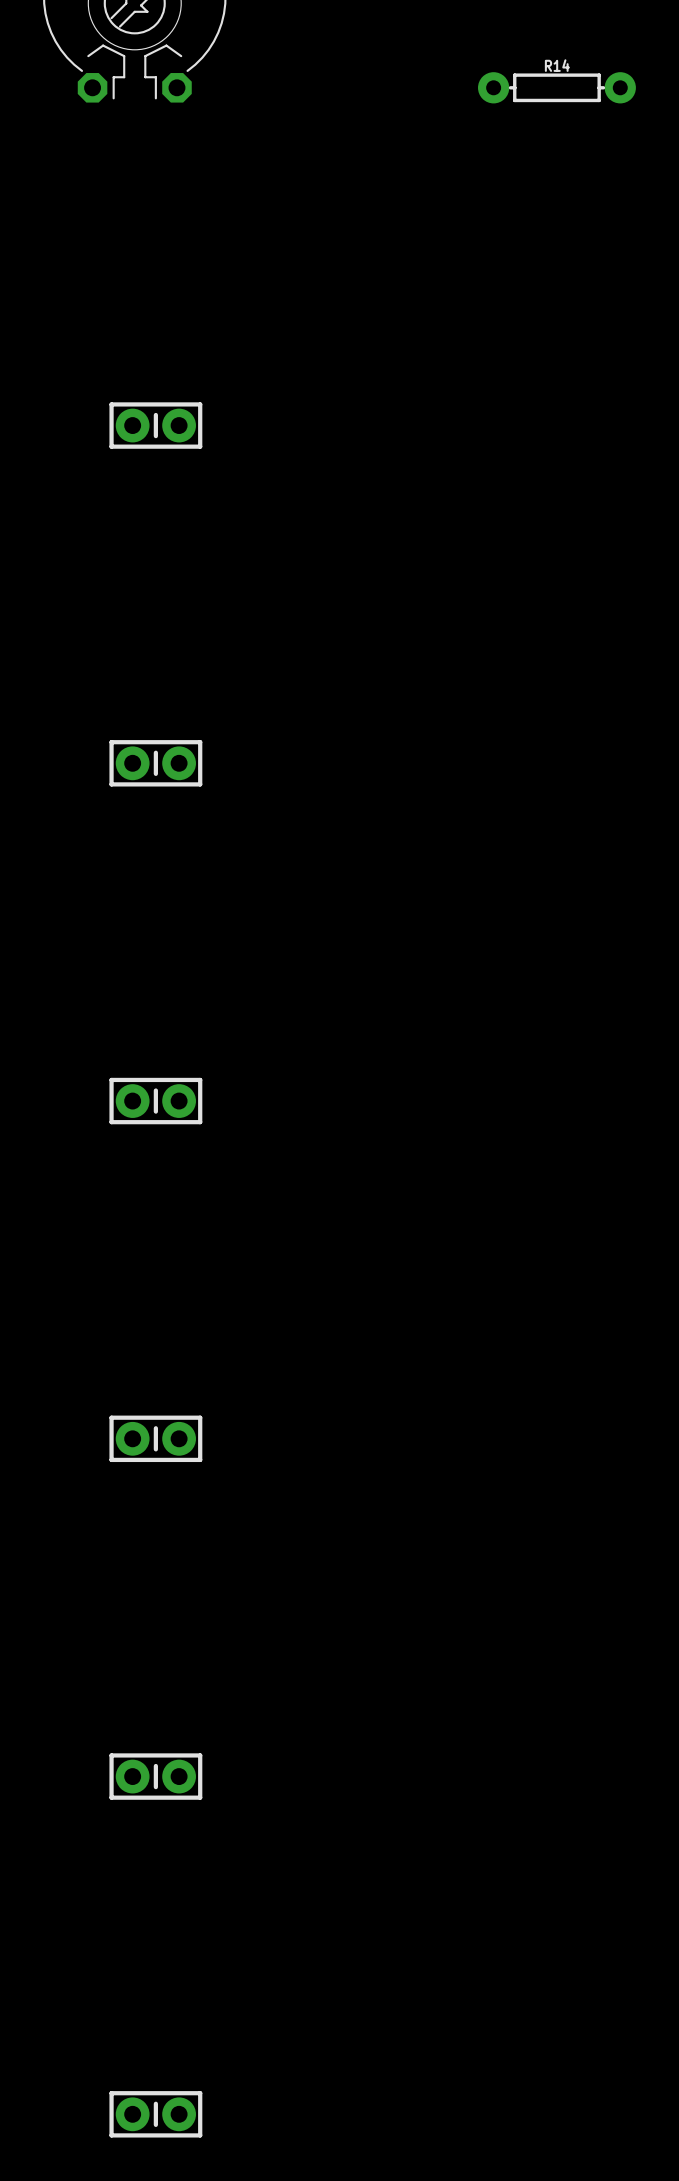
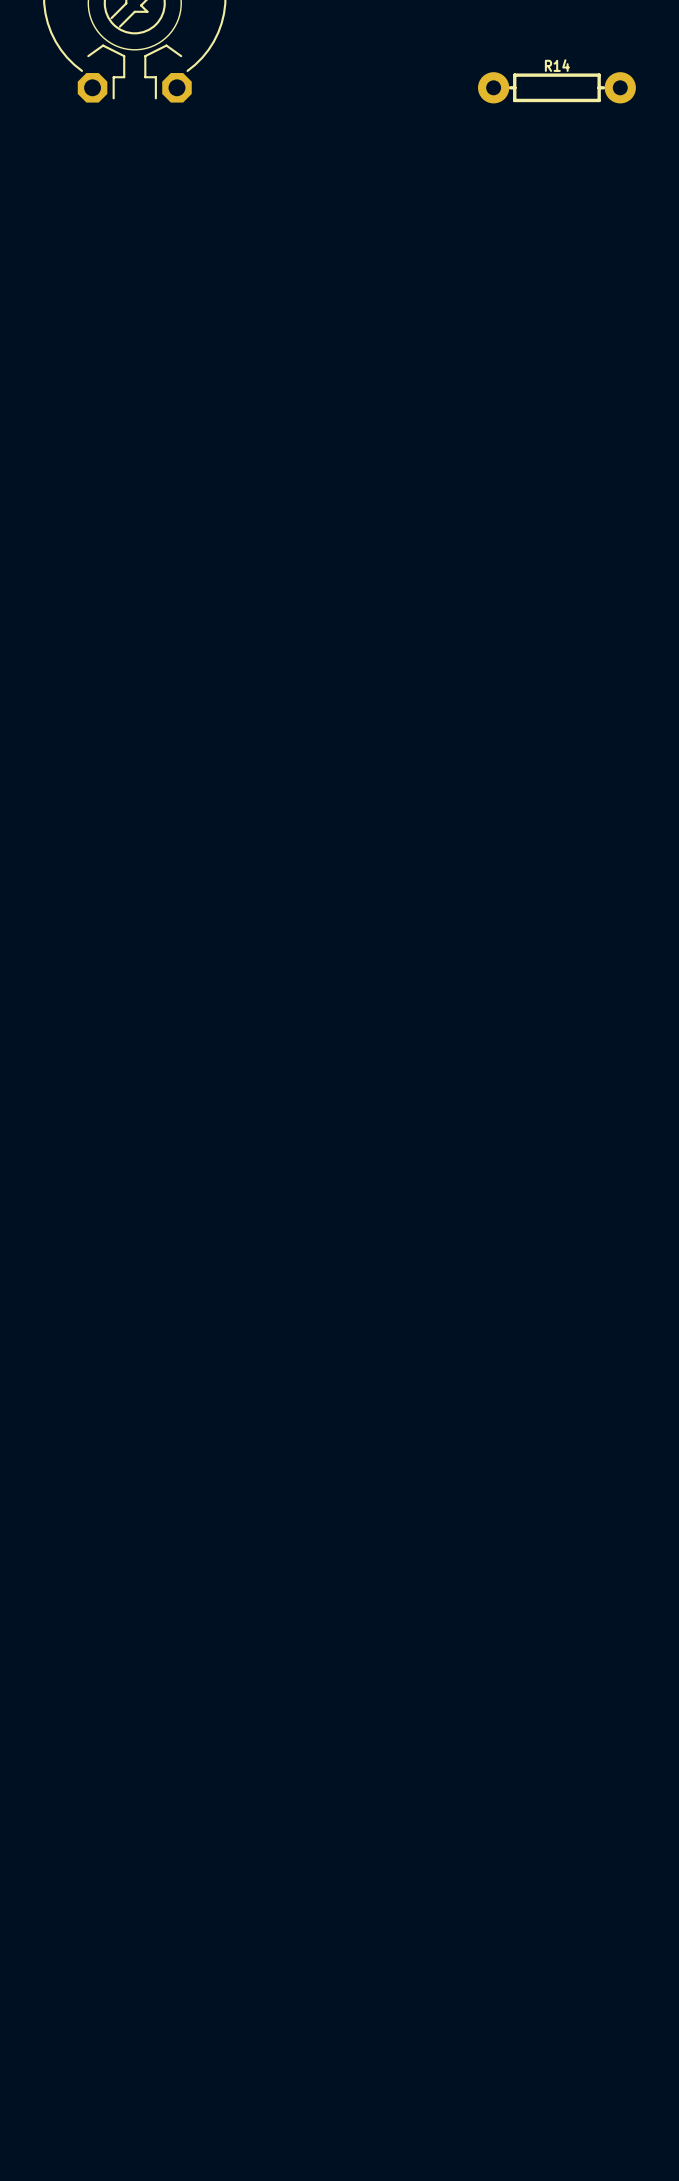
part: (155, 425) -> none
part: (155, 763) -> none
part: (155, 1101) -> none
part: (155, 1438) -> none
part: (155, 1776) -> none
part: (155, 2114) -> none

